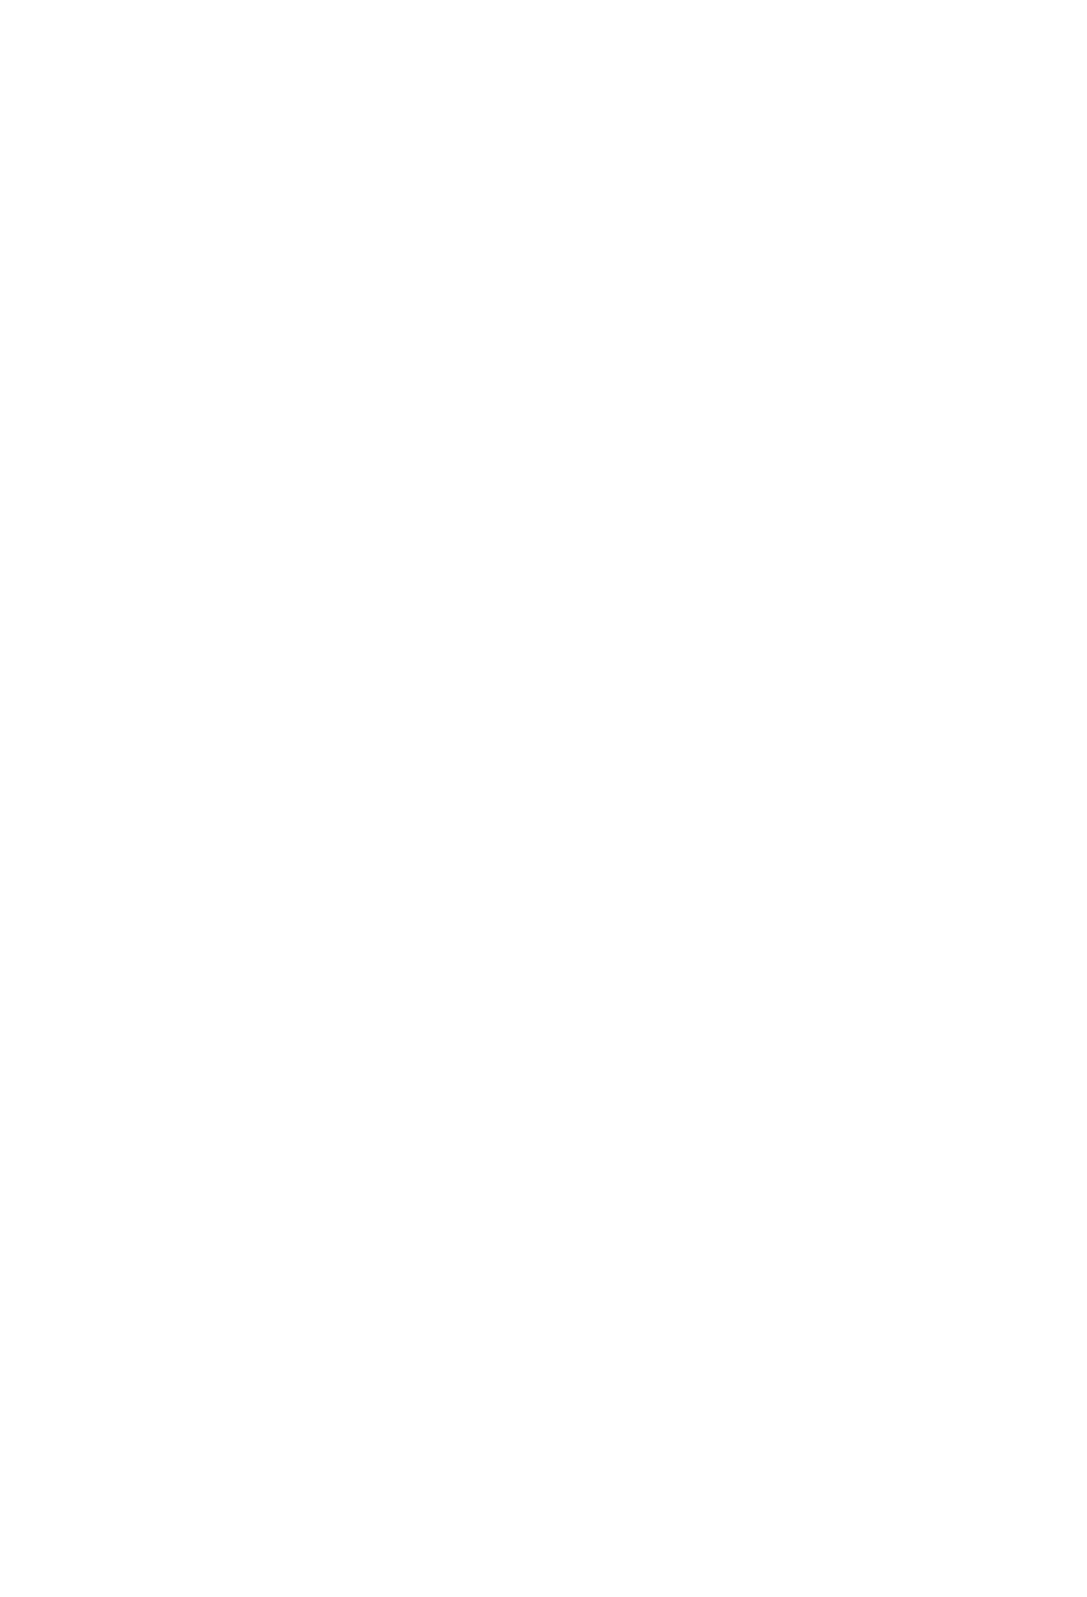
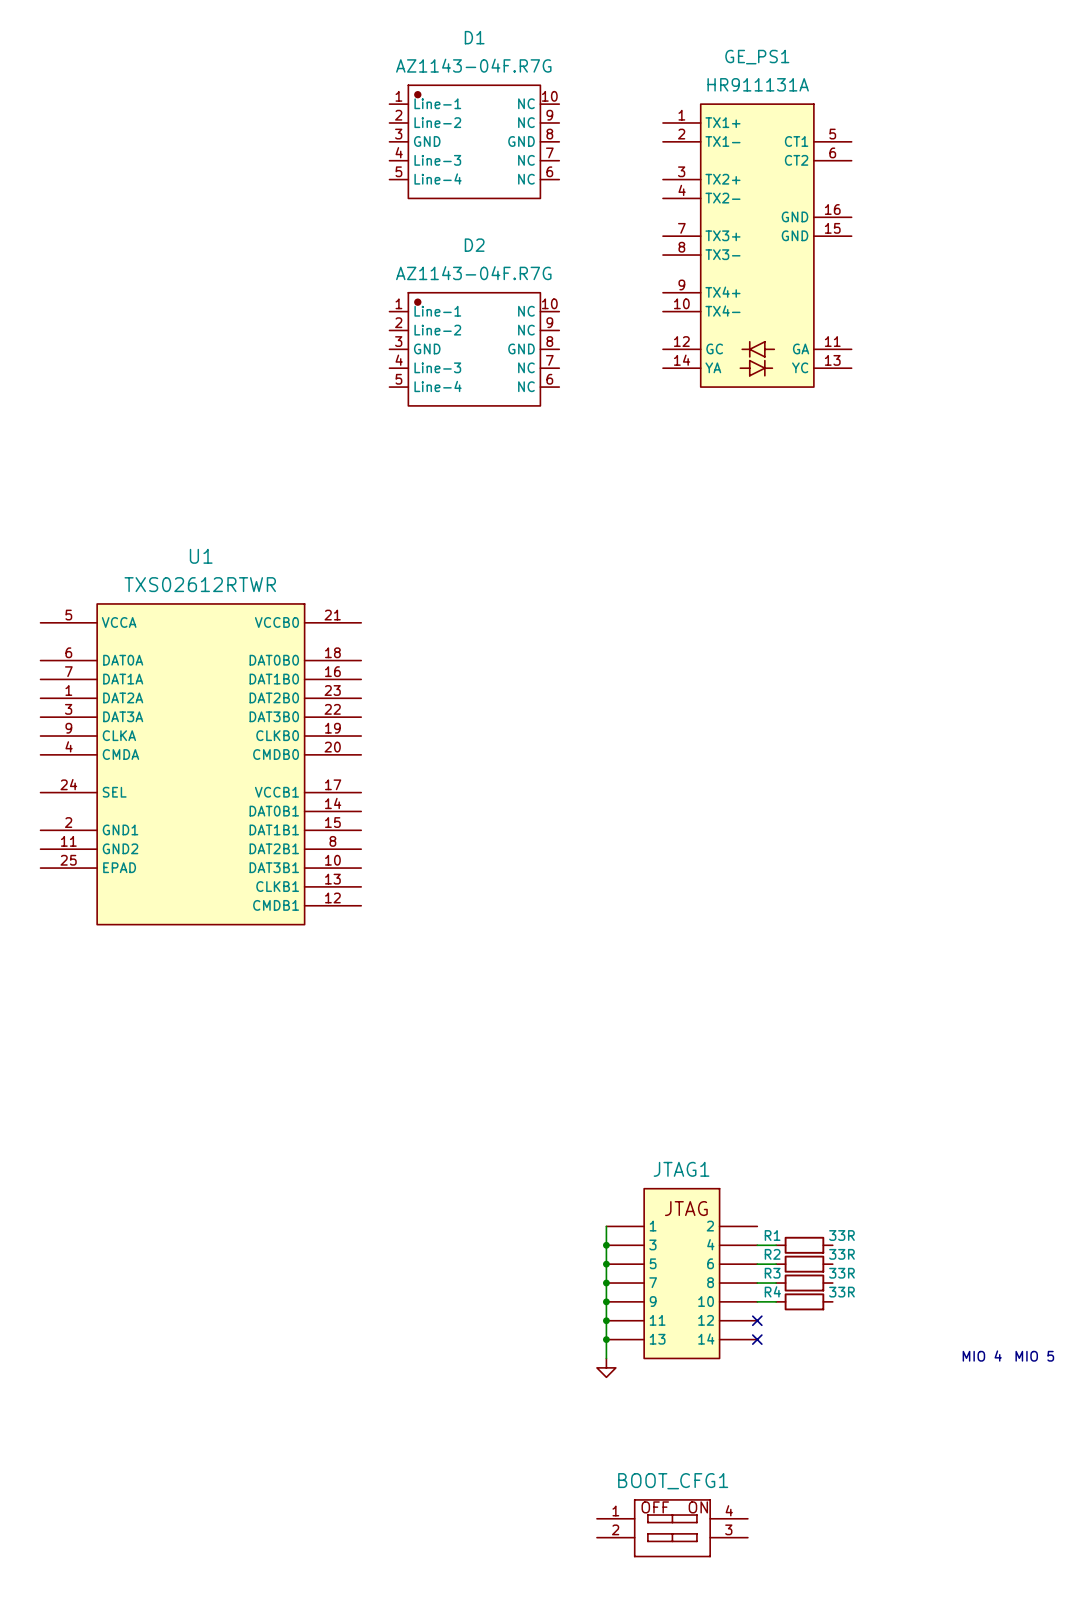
D1: none -> AZ1143-04F.R7G (474, 141)
GE_PS1: none -> HR911131A (757, 245)
D2: none -> AZ1143-04F.R7G (474, 349)
U1: none -> TXS02612RTWR (200, 764)
wire: none -> (606, 1226) (606, 1358)
junction: none -> (606, 1245)
wire: none -> (757, 1245) (776, 1245)
R1: none -> 33R (804, 1245)
junction: none -> (606, 1264)
wire: none -> (757, 1264) (776, 1264)
R2: none -> 33R (804, 1264)
JTAG1: none -> (681, 1273)
junction: none -> (606, 1283)
wire: none -> (757, 1283) (776, 1283)
R3: none -> 33R (804, 1283)
junction: none -> (606, 1301)
wire: none -> (757, 1301) (776, 1301)
R4: none -> 33R (804, 1301)
junction: none -> (606, 1320)
no-connect mark: none -> (757, 1320)
junction: none -> (606, 1339)
no-connect mark: none -> (757, 1339)
text: none -> MIO 4 (982, 1356)
text: none -> MIO 5 (1034, 1356)
power symbol: none -> (606, 1367)
BOOT_CFG1: none -> (672, 1528)

